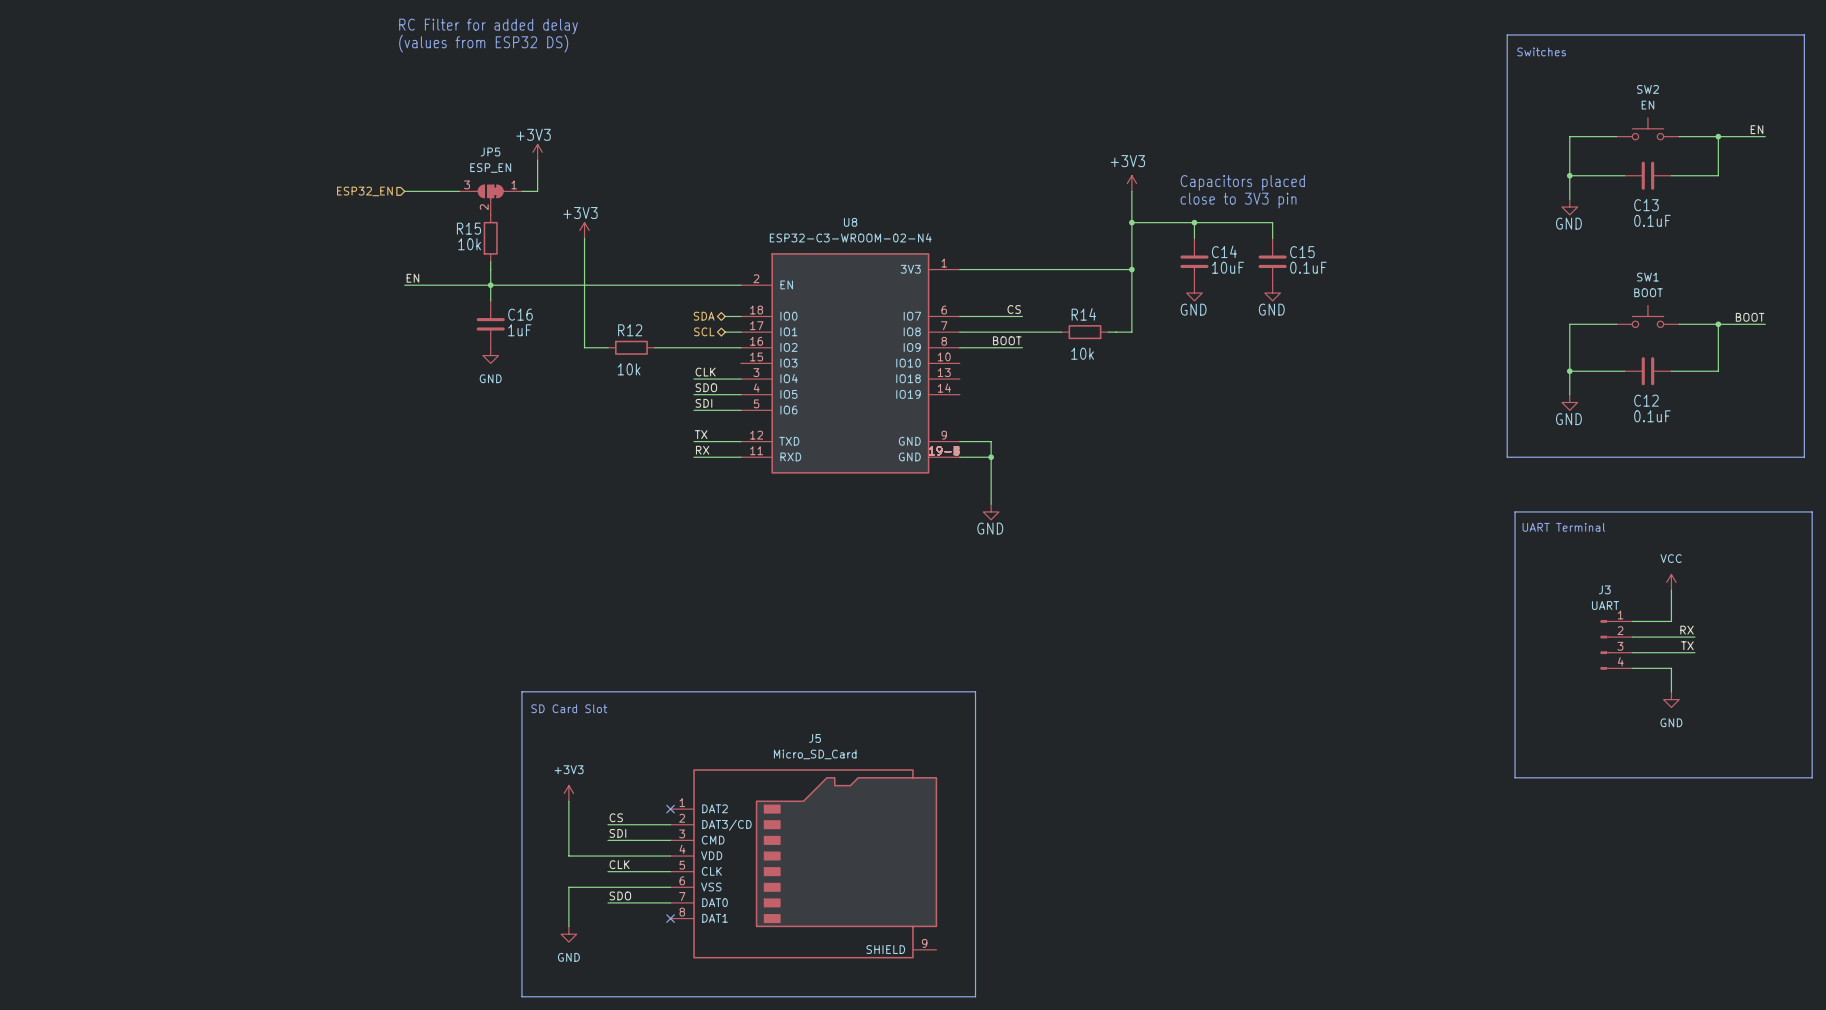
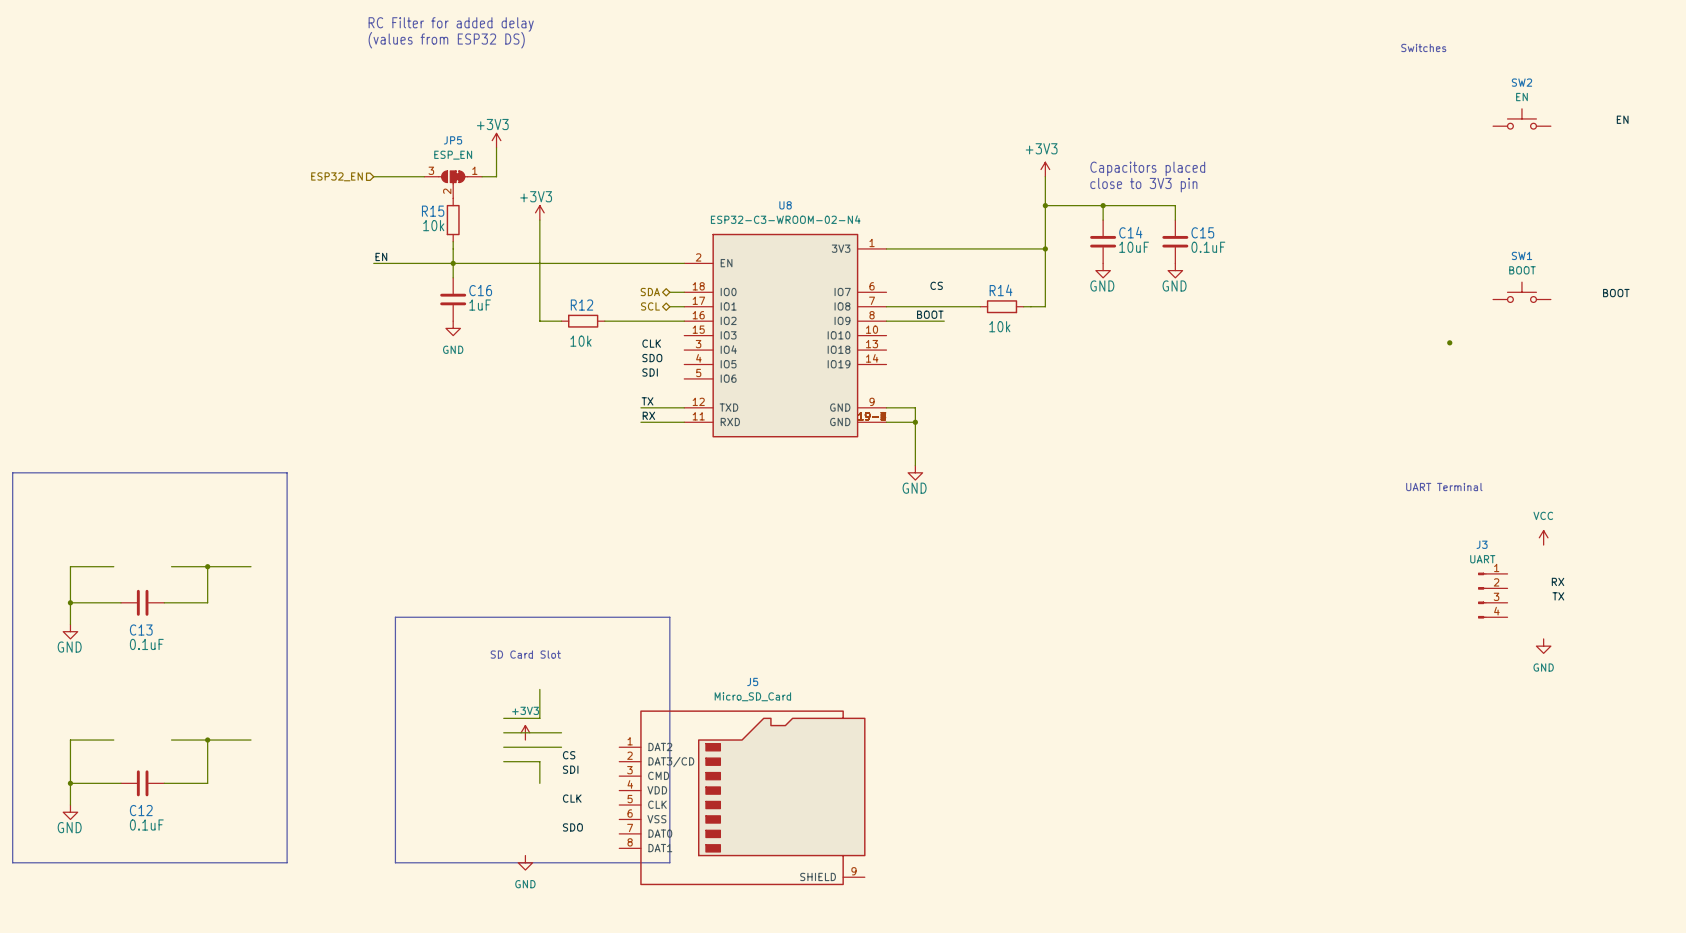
line: (1507, 34) (1804, 34) (1804, 457) (1507, 457) (1507, 34) -> none
wire: (1616, 136) (1569, 136) (1569, 199) -> none
wire: (1679, 136) (1765, 136) -> none
wire: (1718, 136) (1718, 175) (1671, 175) -> none
junction: (1718, 136) -> none
wire: (1569, 175) (1624, 175) -> none
junction: (1569, 175) -> none
C13 position: (1647, 175) -> (142, 602)
power symbol: GND (1569, 207) -> none
wire: (959, 316) (1022, 316) -> none
wire: (1616, 324) (1569, 324) (1569, 394) -> none
wire: (1679, 324) (1765, 324) -> none
wire: (1718, 324) (1718, 371) (1671, 371) -> none
junction: (1718, 324) -> none
wire: (1569, 371) (1624, 371) -> none
C12 position: (1647, 371) -> (142, 783)
wire: (694, 379) (740, 379) -> none
wire: (694, 394) (740, 394) -> none
power symbol: GND (1569, 402) -> none
wire: (694, 410) (740, 410) -> none
line: none -> (12, 472) (287, 472) (287, 862) (12, 862) (12, 472)
line: (1515, 511) (1812, 511) (1812, 777) (1515, 777) (1515, 511) -> none
wire: (1671, 590) (1671, 621) (1632, 621) -> none
wire: none -> (113, 566) (70, 566) (70, 624)
wire: none -> (171, 566) (250, 566)
wire: none -> (207, 566) (207, 602) (164, 602)
junction: none -> (207, 566)
wire: (1632, 637) (1694, 637) -> none
wire: none -> (70, 602) (121, 602)
junction: none -> (70, 602)
wire: (1632, 652) (1694, 652) -> none
line: none -> (395, 617) (669, 617) (669, 862) (395, 862) (395, 617)
wire: (1632, 668) (1671, 668) (1671, 691) -> none
power symbol: none -> GND (70, 631)
line: (521, 691) (975, 691) (975, 996) (521, 996) (521, 691) -> none
wire: none -> (539, 689) (539, 718) (503, 718)
wire: none -> (113, 740) (70, 740) (70, 805)
wire: none -> (171, 740) (250, 740)
wire: none -> (207, 740) (207, 783) (164, 783)
junction: none -> (207, 740)
wire: (568, 801) (568, 856) (670, 856) -> none
no-connect mark: (670, 809) -> none
wire: none -> (503, 761) (539, 761) (539, 783)
wire: (608, 824) (670, 824) -> (503, 732) (561, 732)
wire: (608, 840) (670, 840) -> (503, 747) (561, 747)
wire: none -> (70, 783) (121, 783)
junction: none -> (70, 783)
wire: (608, 871) (670, 871) -> none
power symbol: none -> GND (70, 812)
wire: (670, 887) (568, 887) (568, 926) -> none
wire: (608, 902) (670, 902) -> none
no-connect mark: (670, 918) -> none

